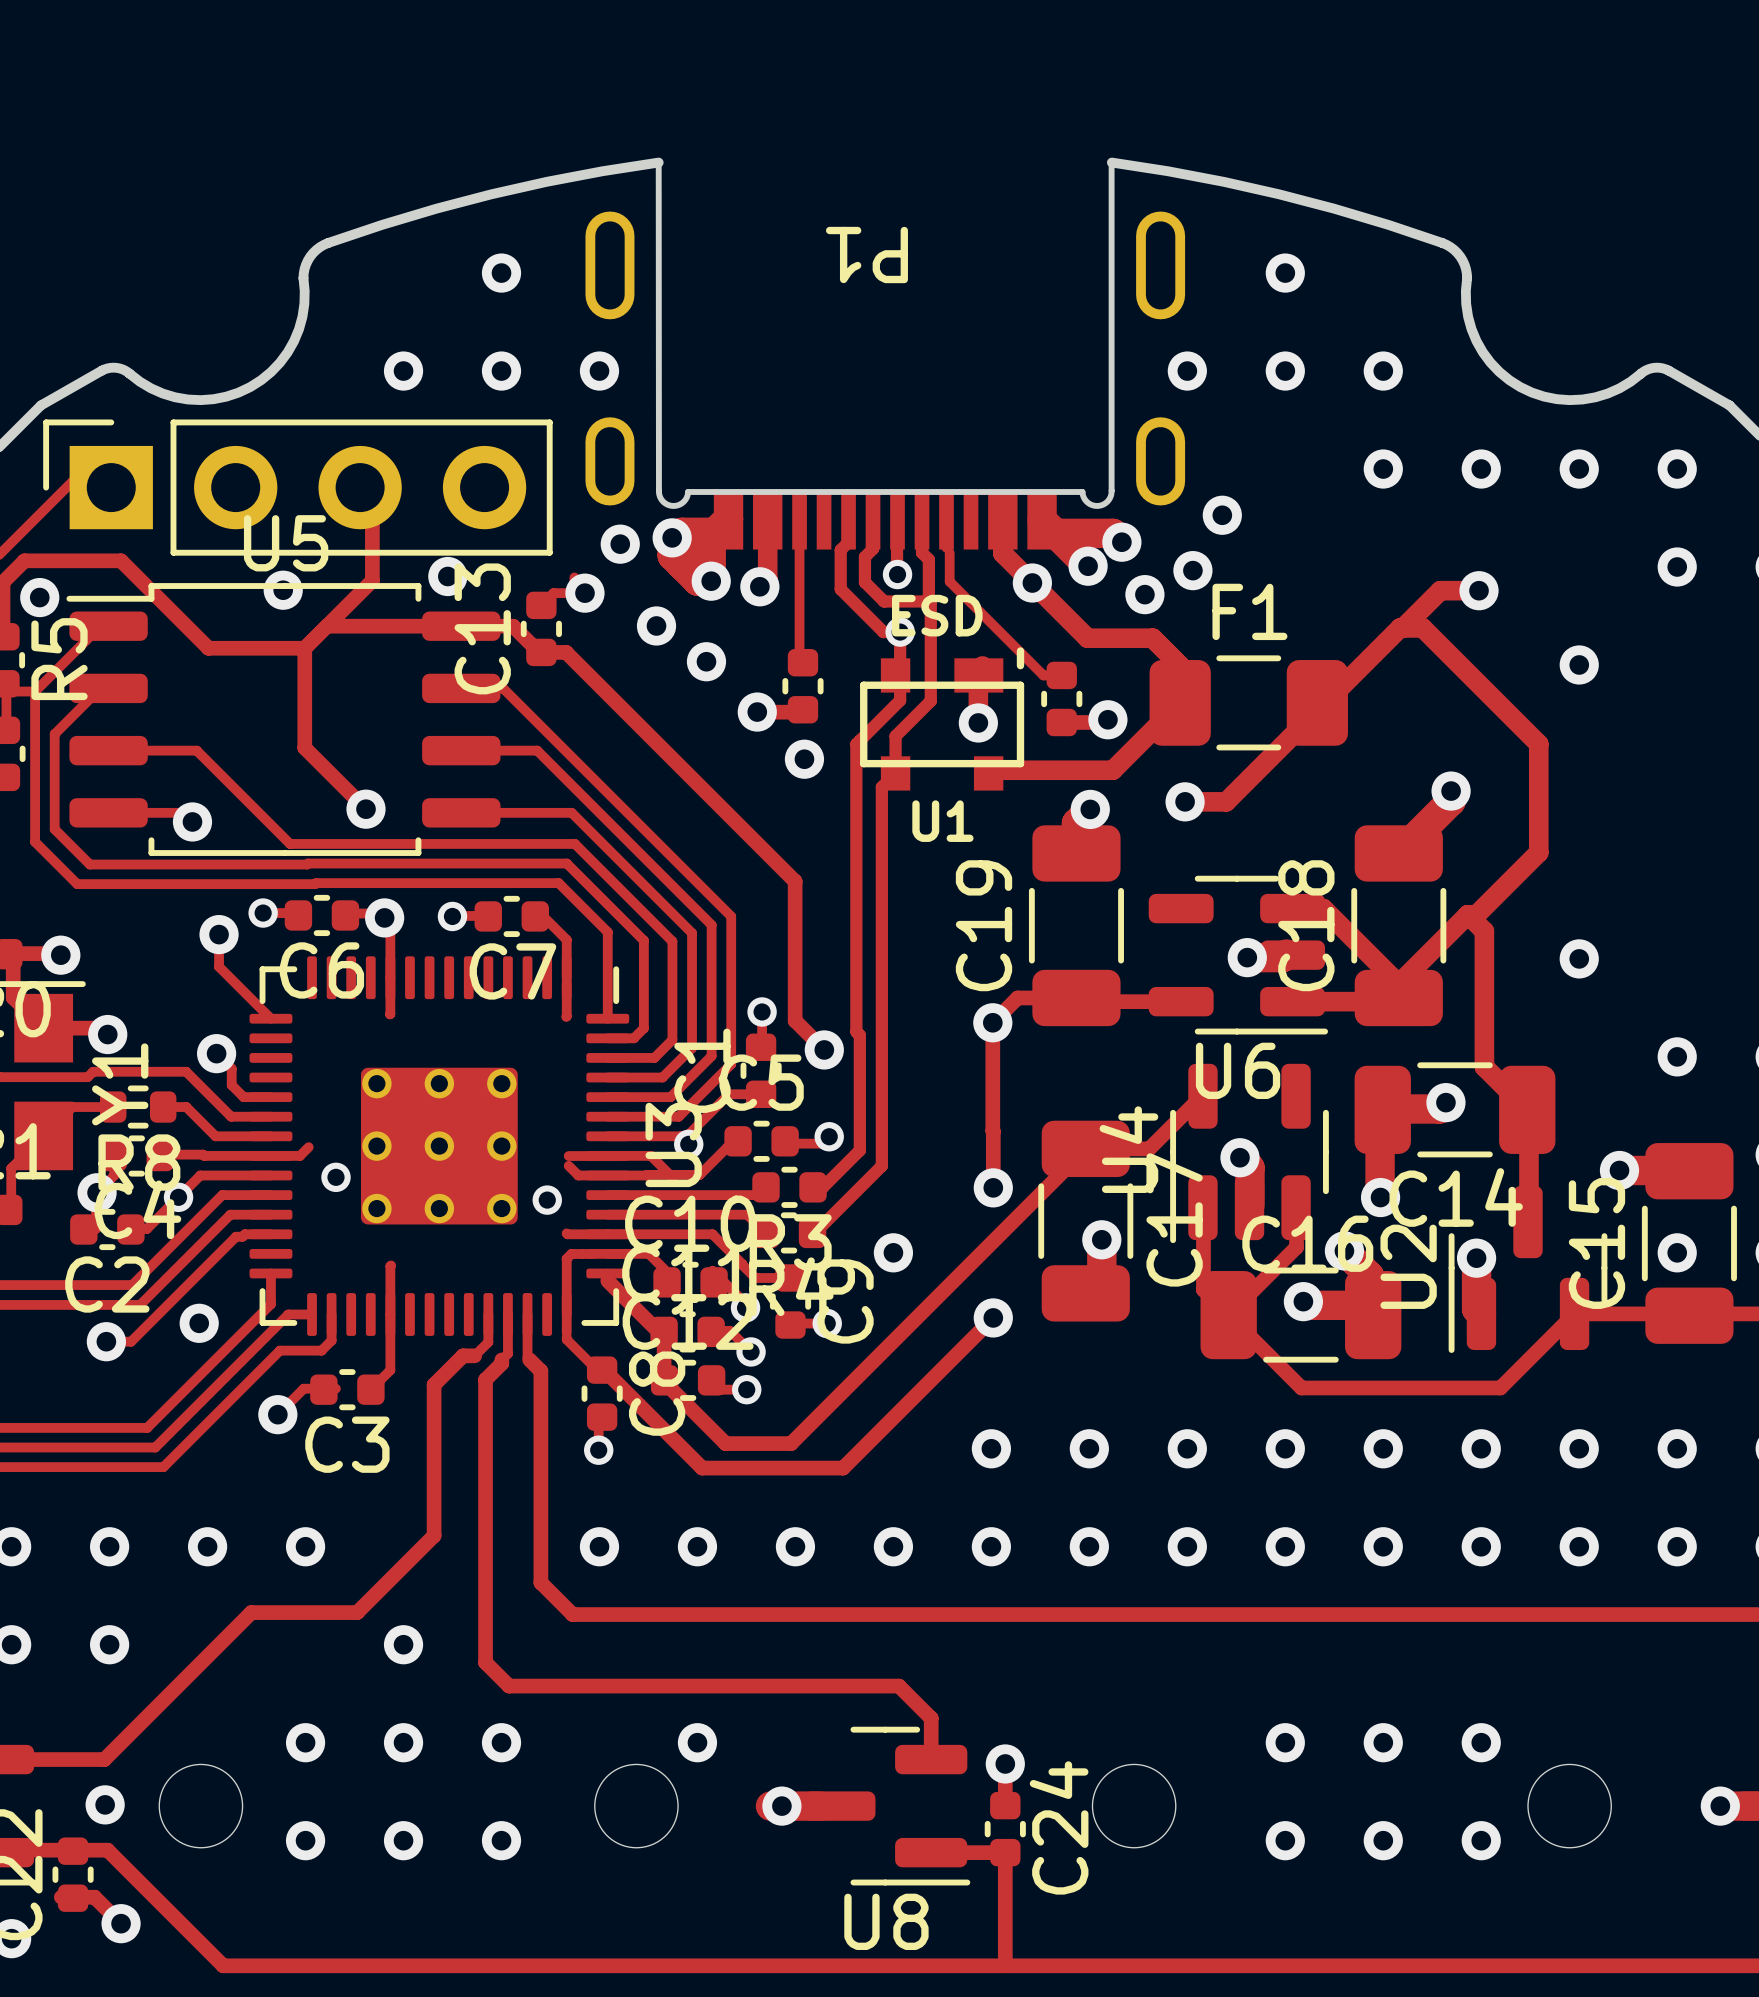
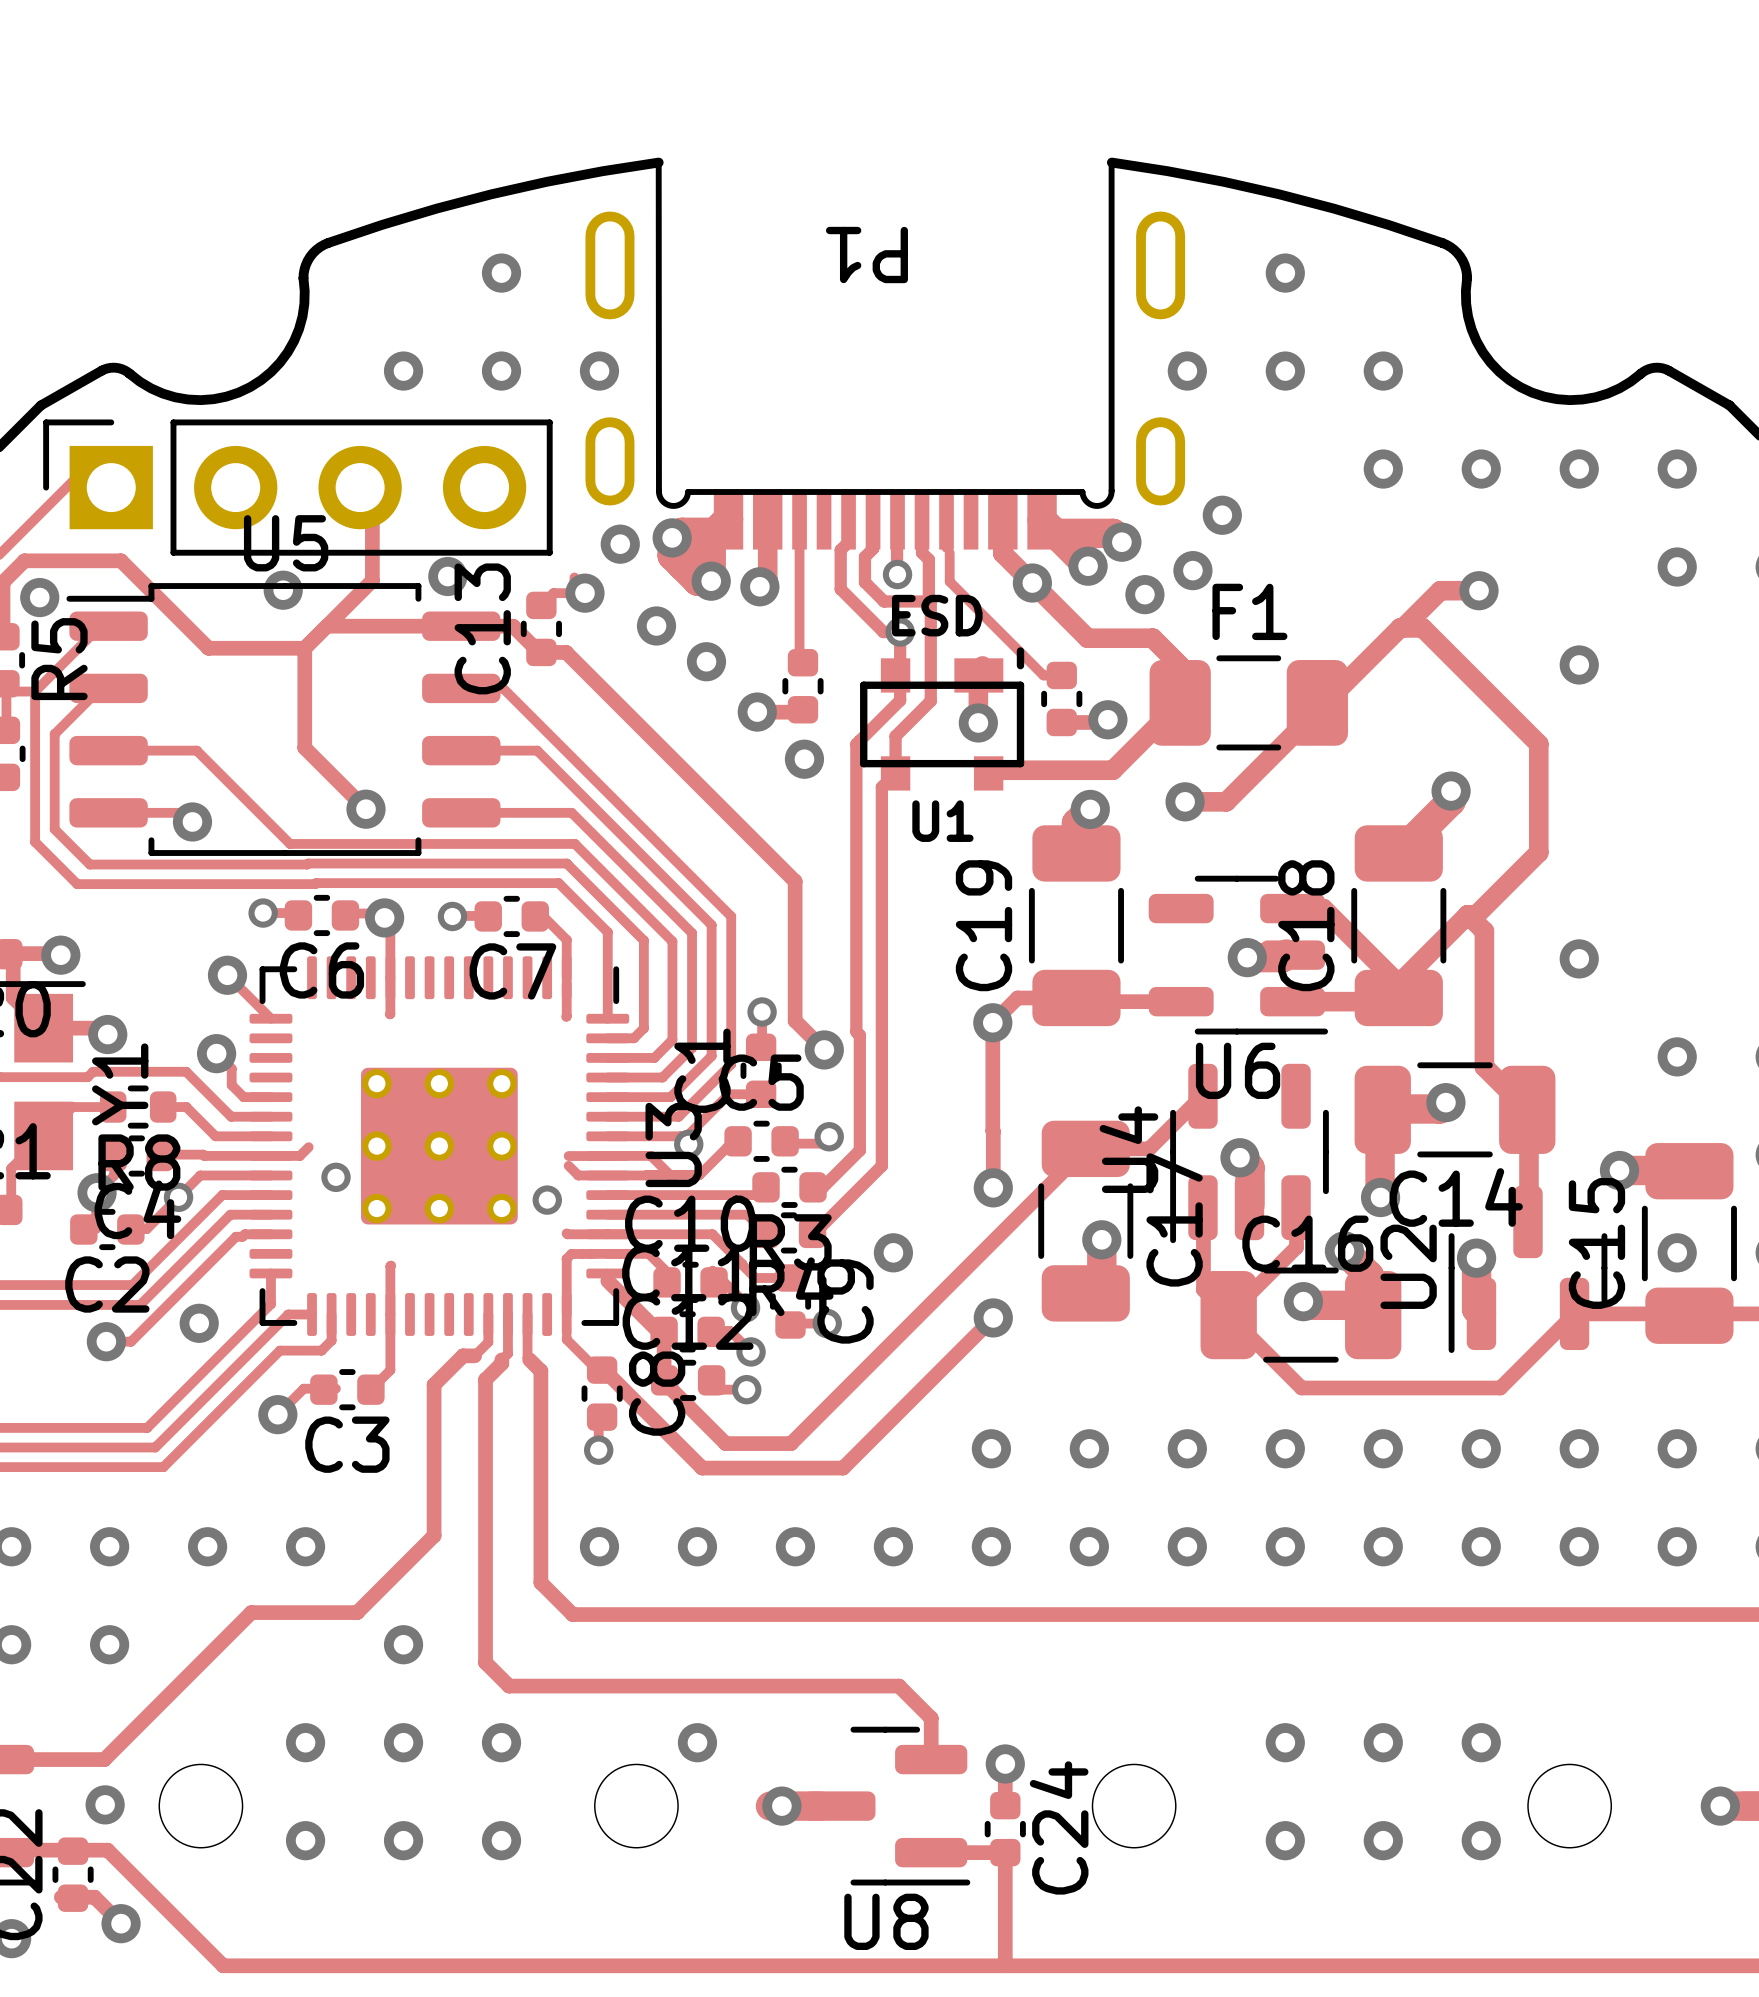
track: (219, 934) (219, 966) (227, 975) -> none
via position: (219, 934) -> (227, 975)

